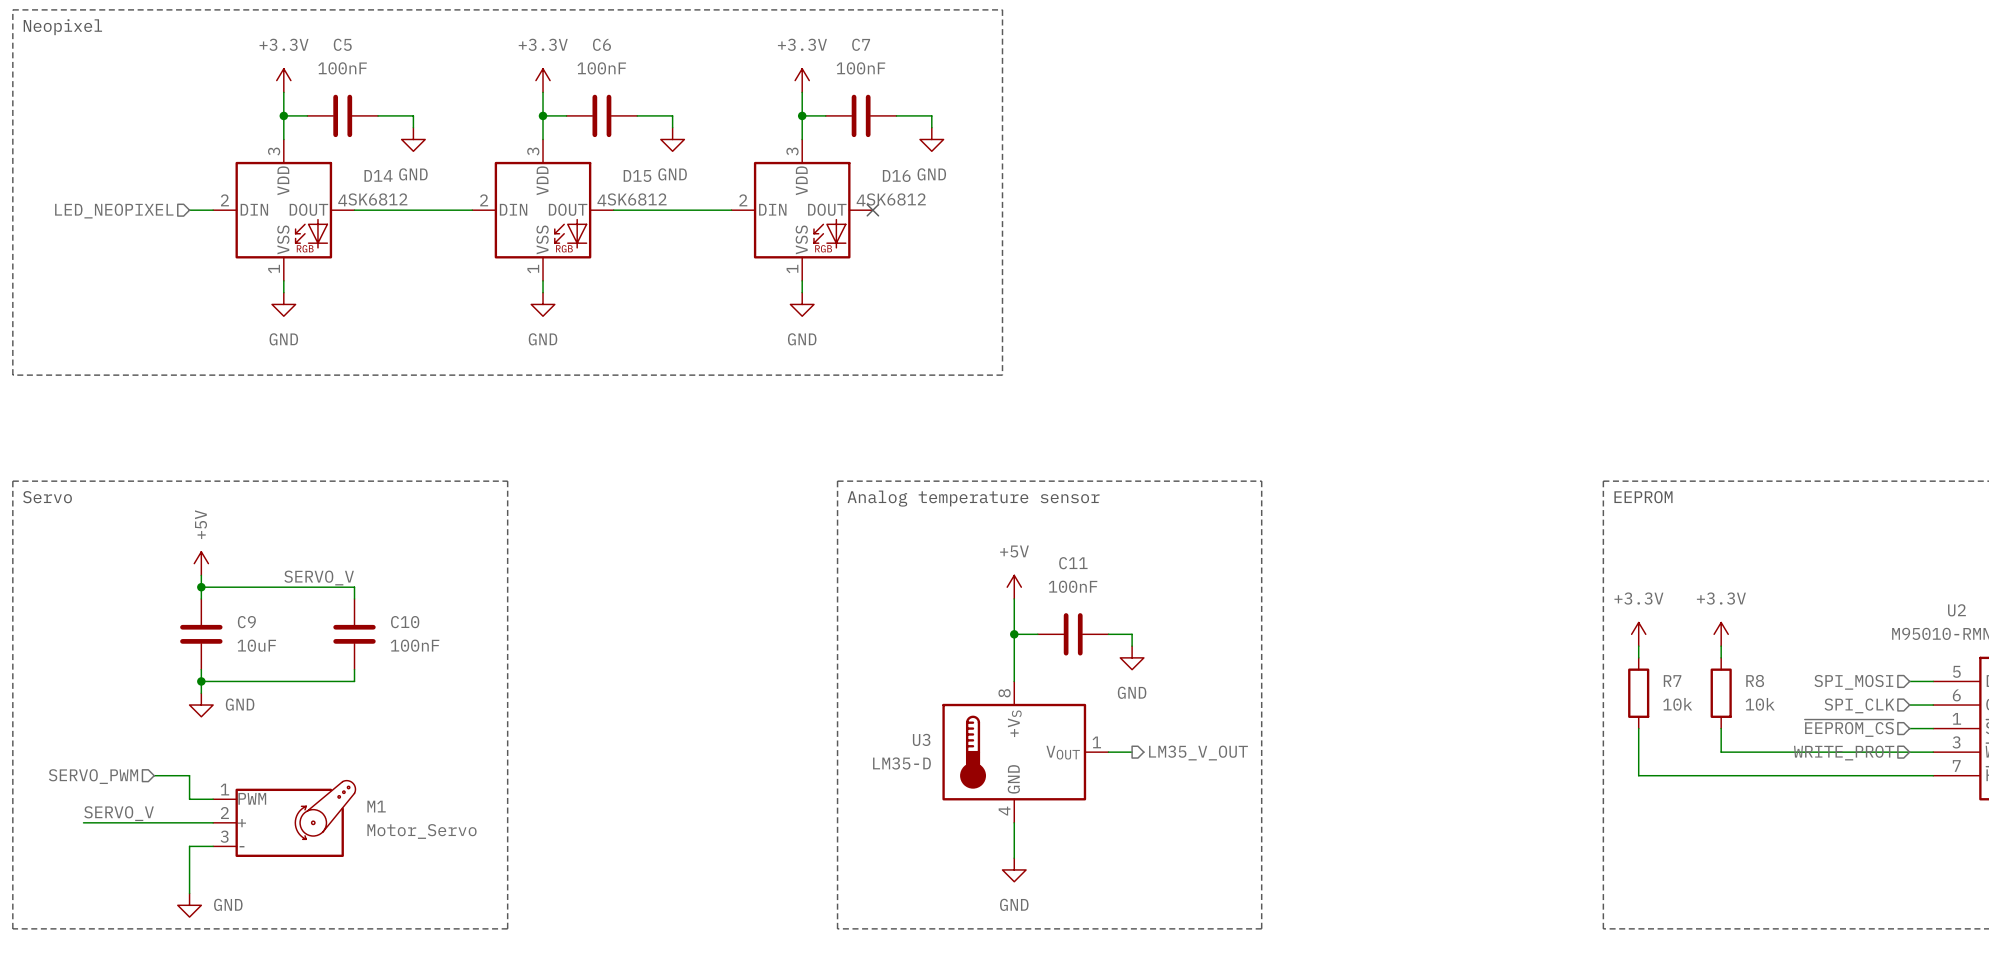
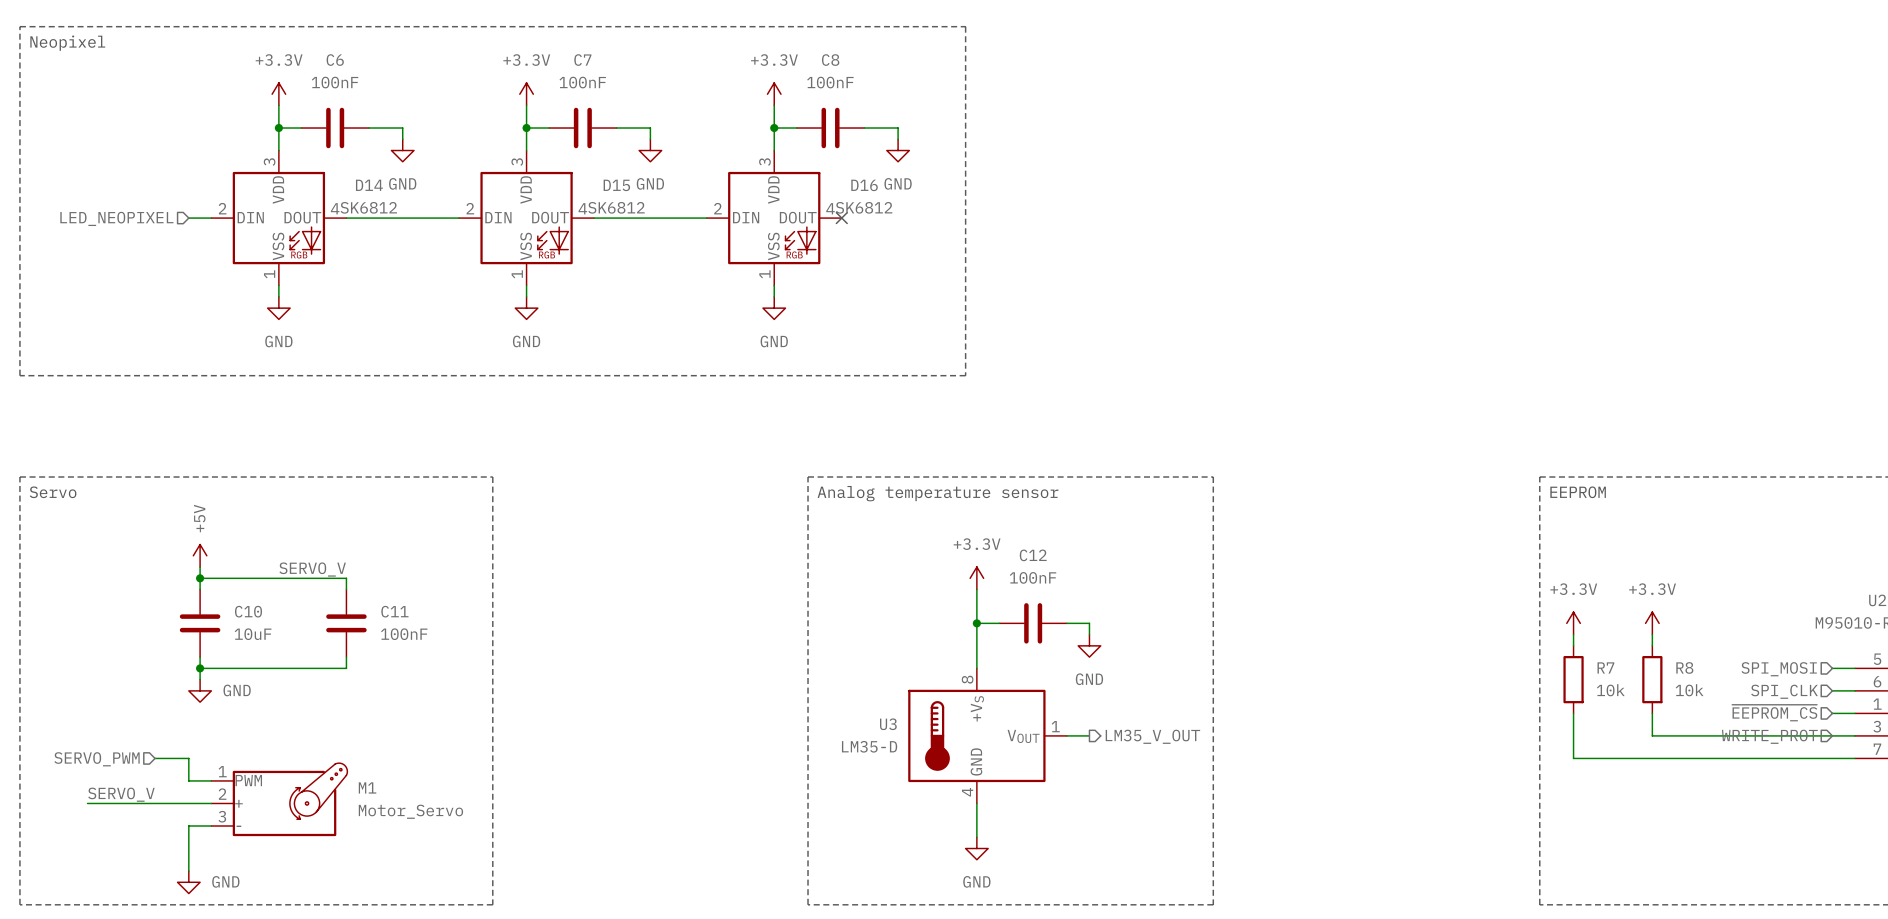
C5 name: C5 (342, 44) -> C6 (335, 60)
C6 name: C6 (601, 44) -> C7 (582, 60)
C7 name: C7 (861, 44) -> C8 (830, 60)
C11 name: C11 (1073, 563) -> C12 (1033, 555)
power symbol: +5V (1014, 587) -> +3.3V (976, 578)
C9 name: C9 (246, 622) -> C10 (248, 611)
C10 name: C10 (405, 622) -> C11 (394, 611)

